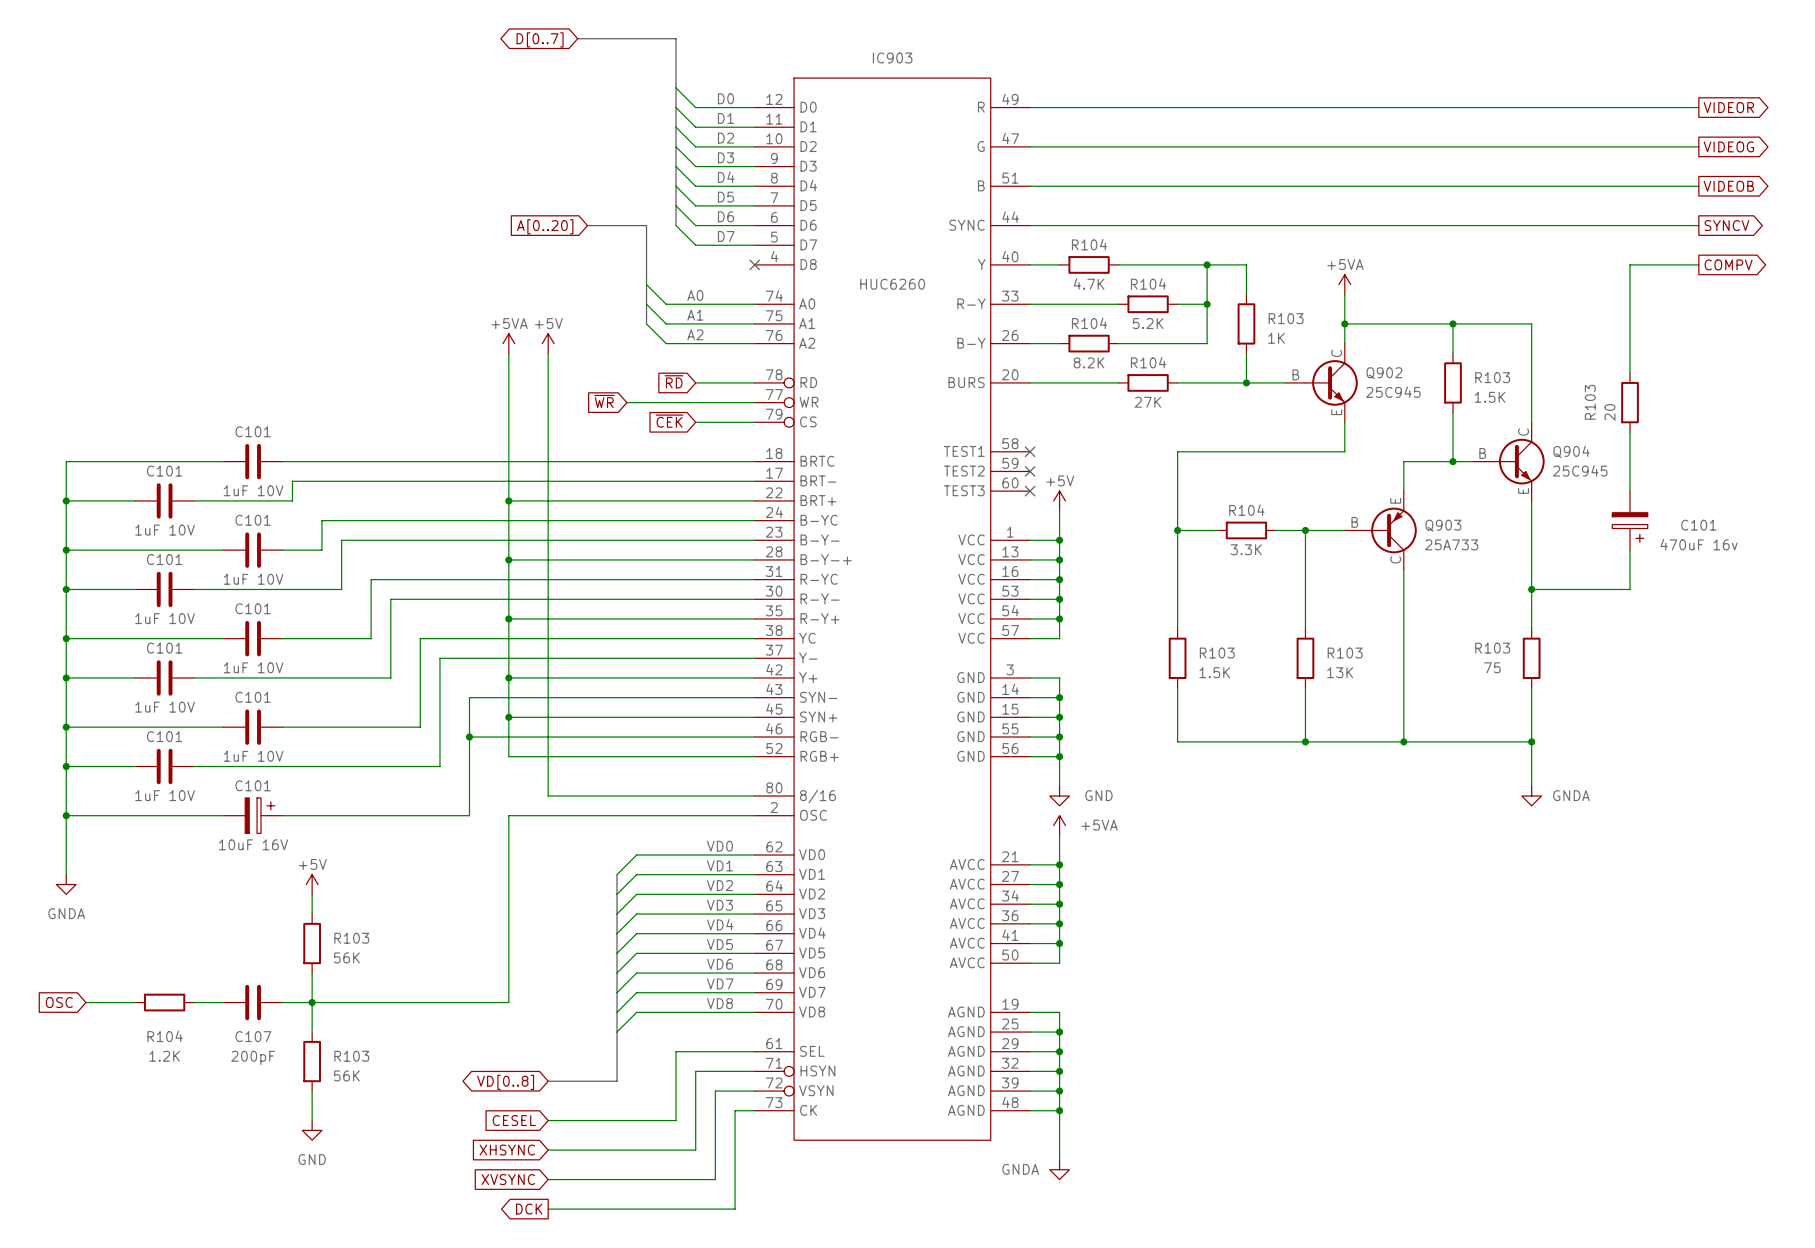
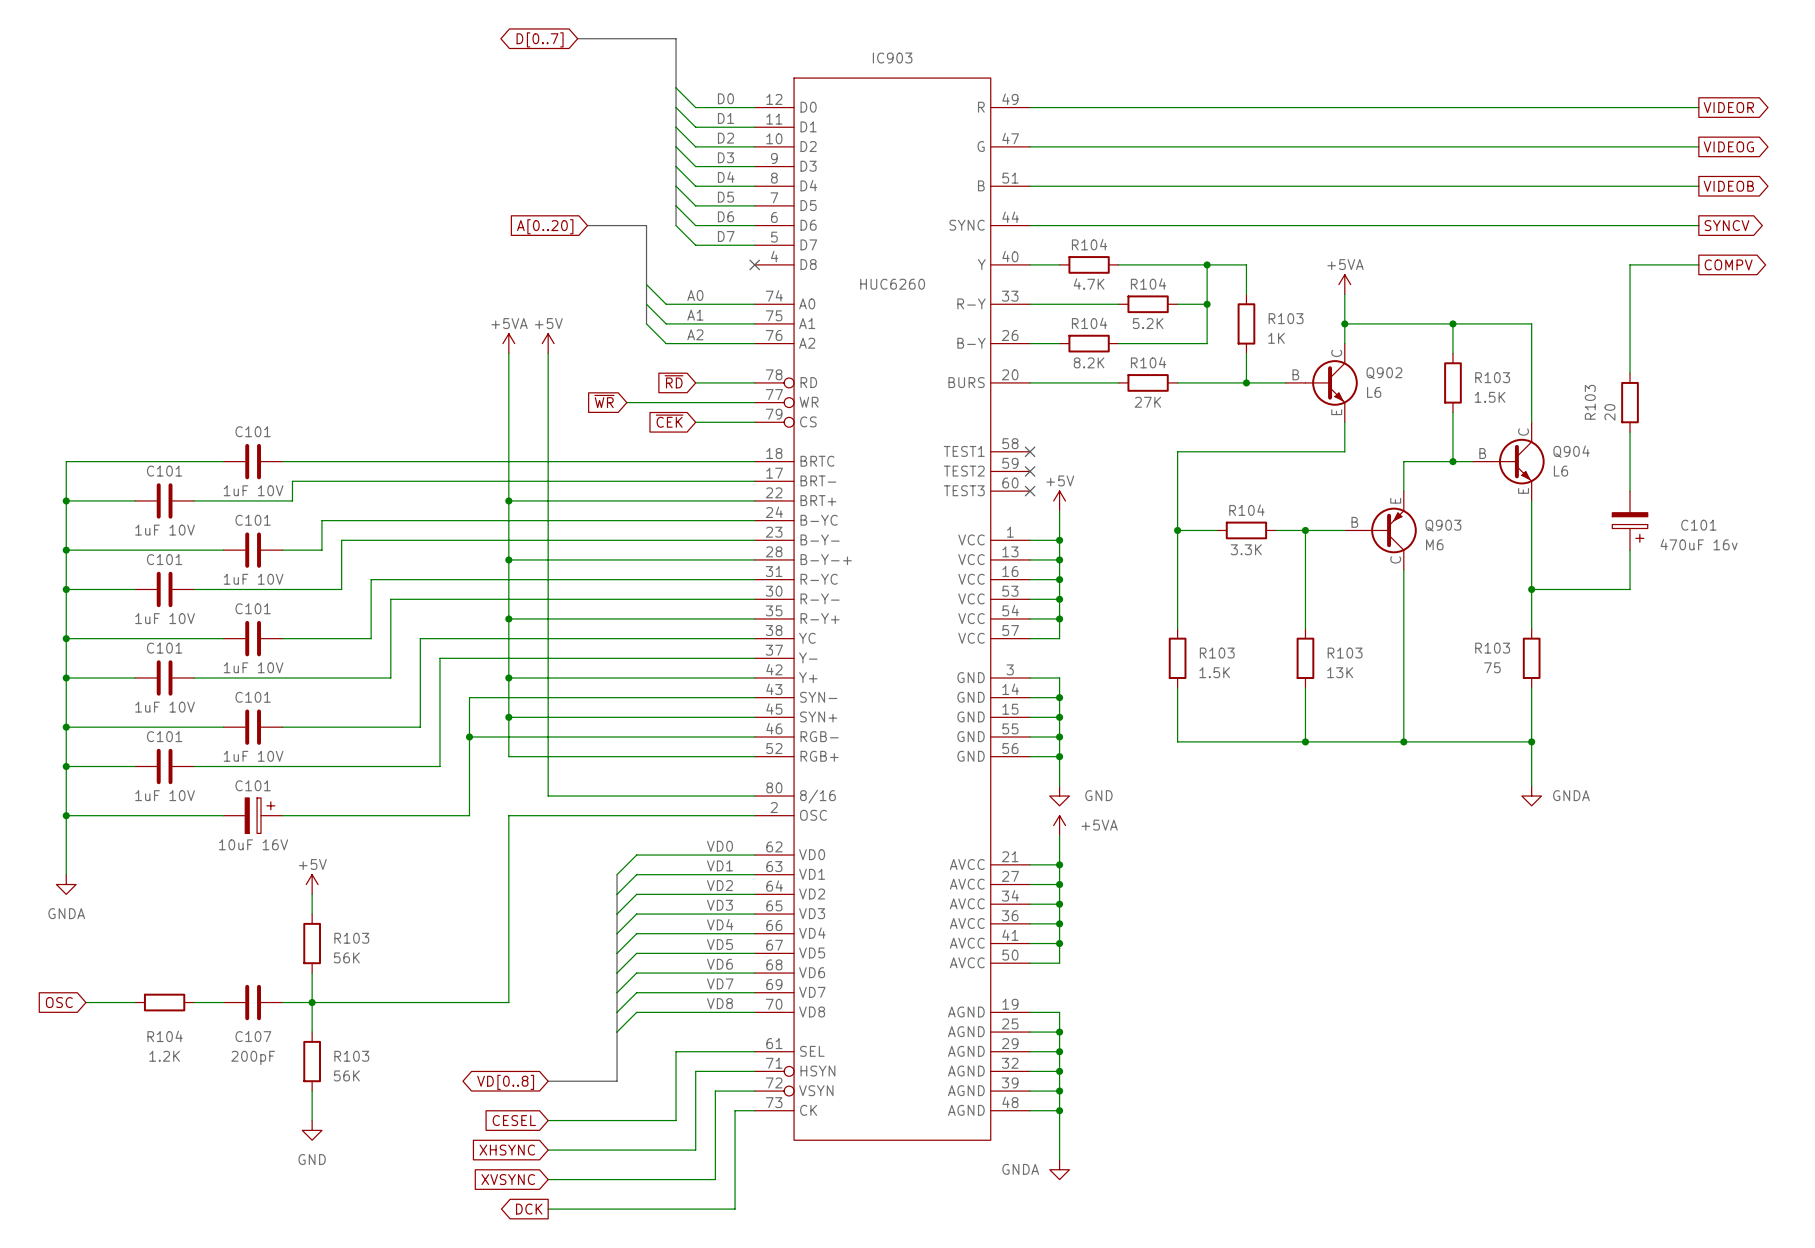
Q902 value: 25C945 (1393, 392) -> L6 (1374, 392)
Q904 value: 25C945 (1580, 470) -> L6 (1561, 471)
Q903 value: 25A733 (1451, 544) -> M6 (1434, 544)

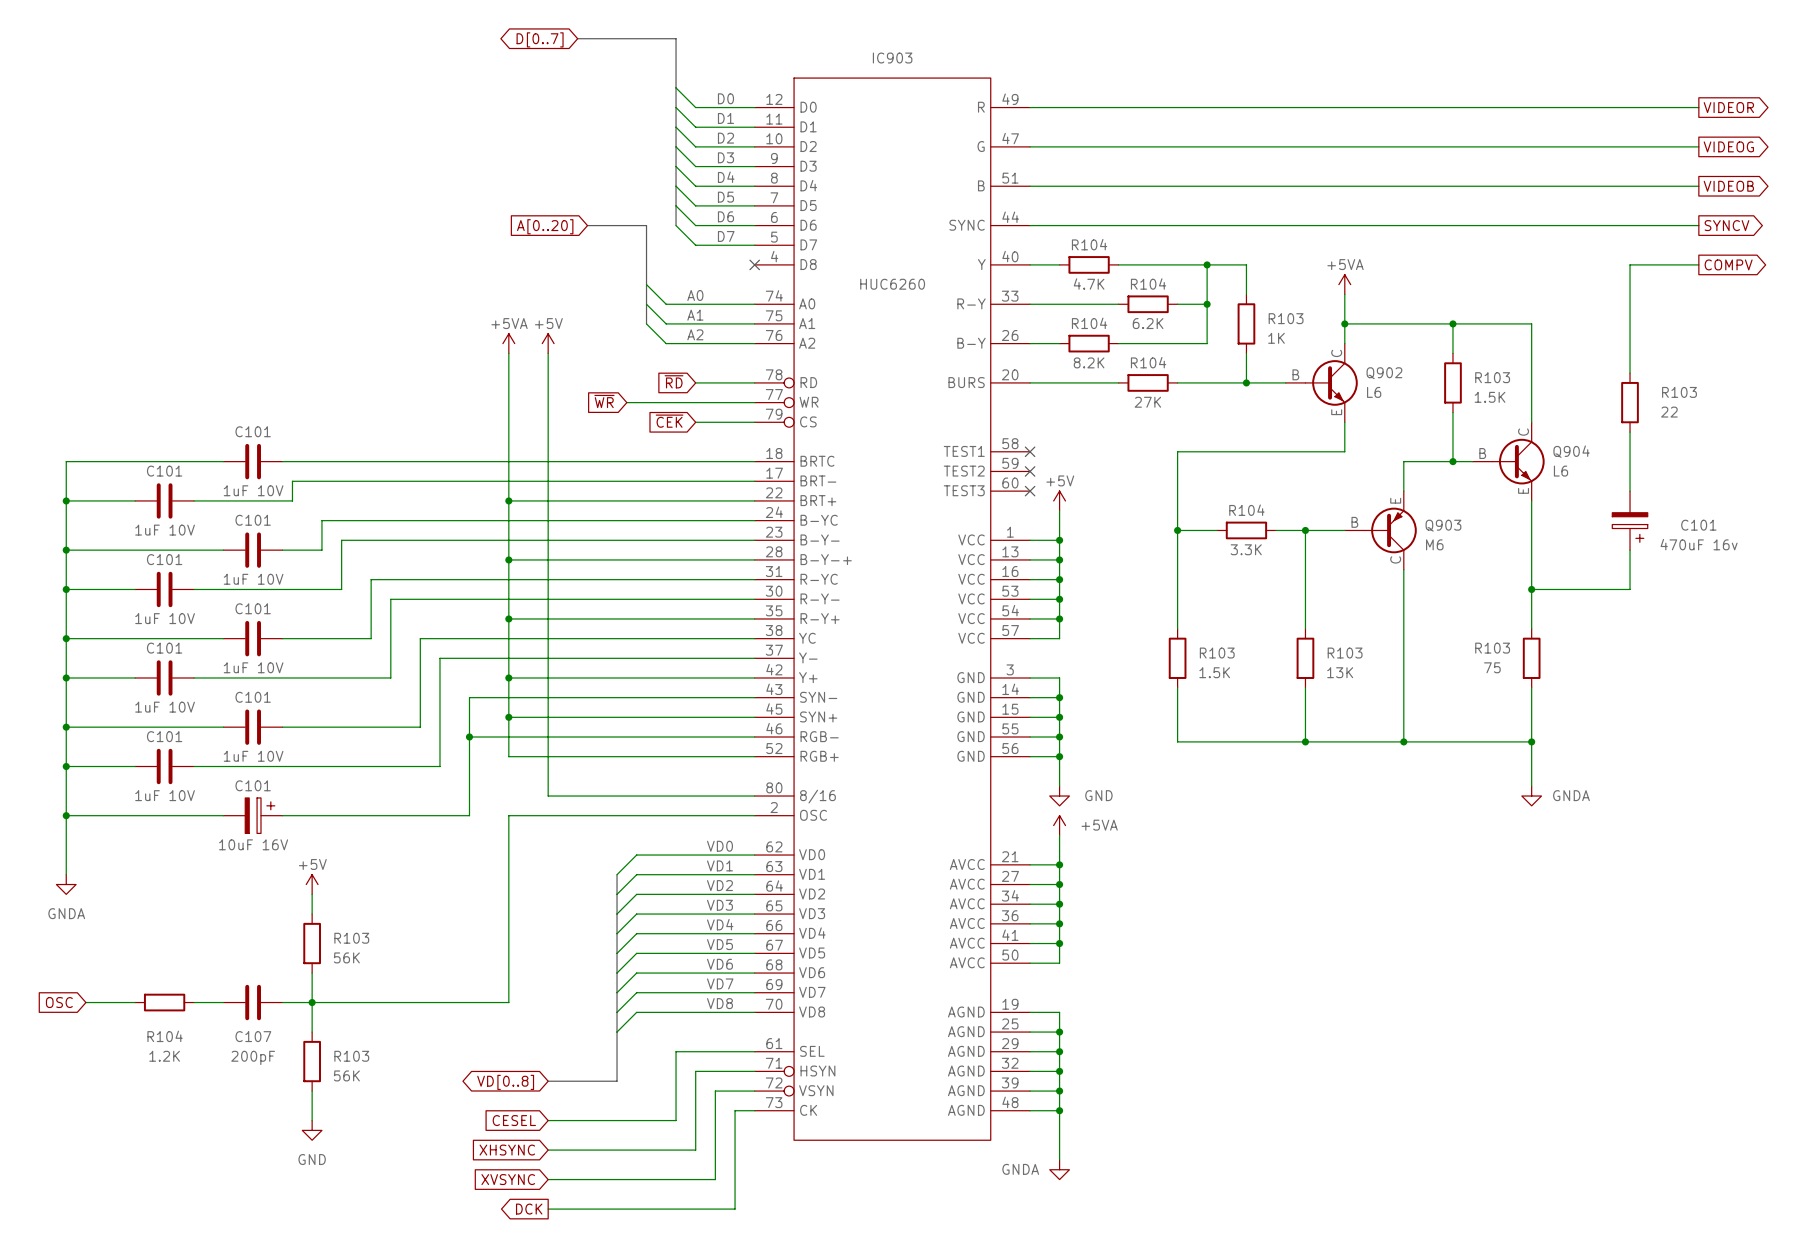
R104 value: 5.2K (1148, 323) -> 6.2K (1148, 323)
R103 name rotation: 0° (1590, 402) -> 90° clockwise (1679, 392)
R103 name position: R103 (1590, 402) -> R103 (1679, 392)
R103 value: 20 (1609, 412) -> 22 (1669, 412)

